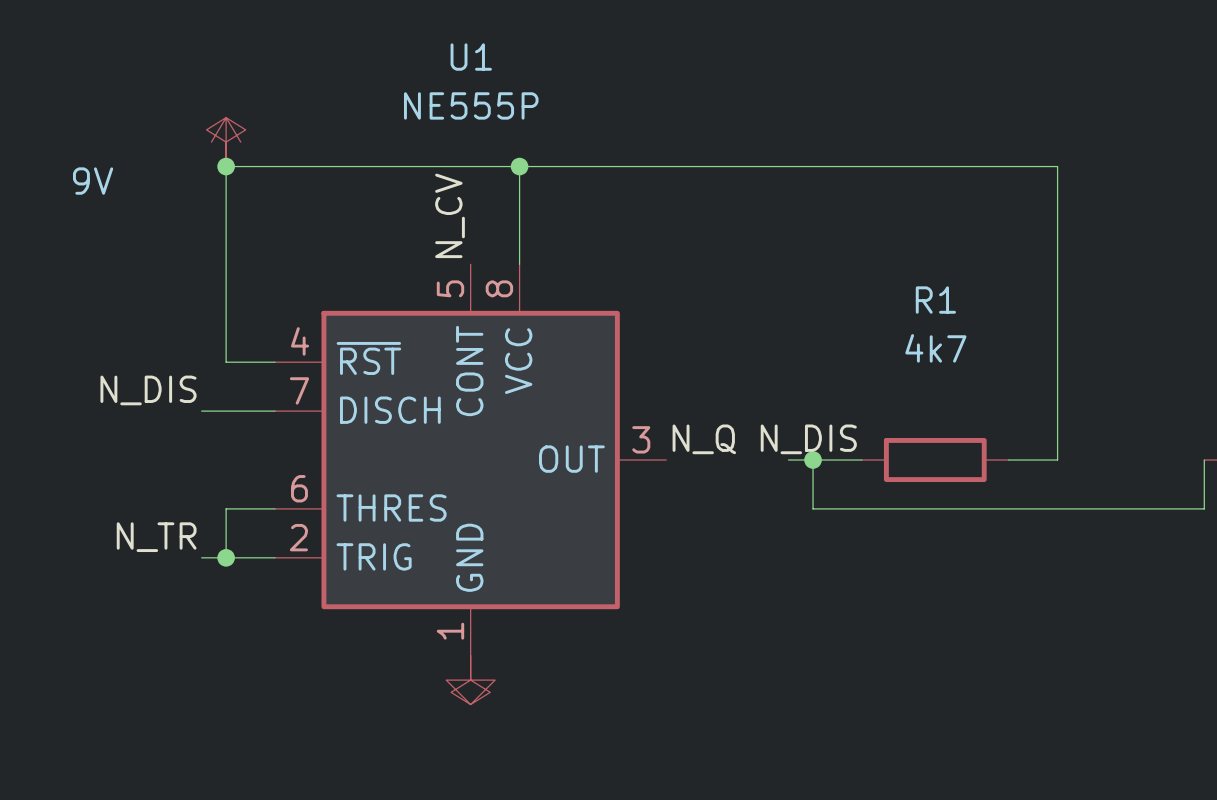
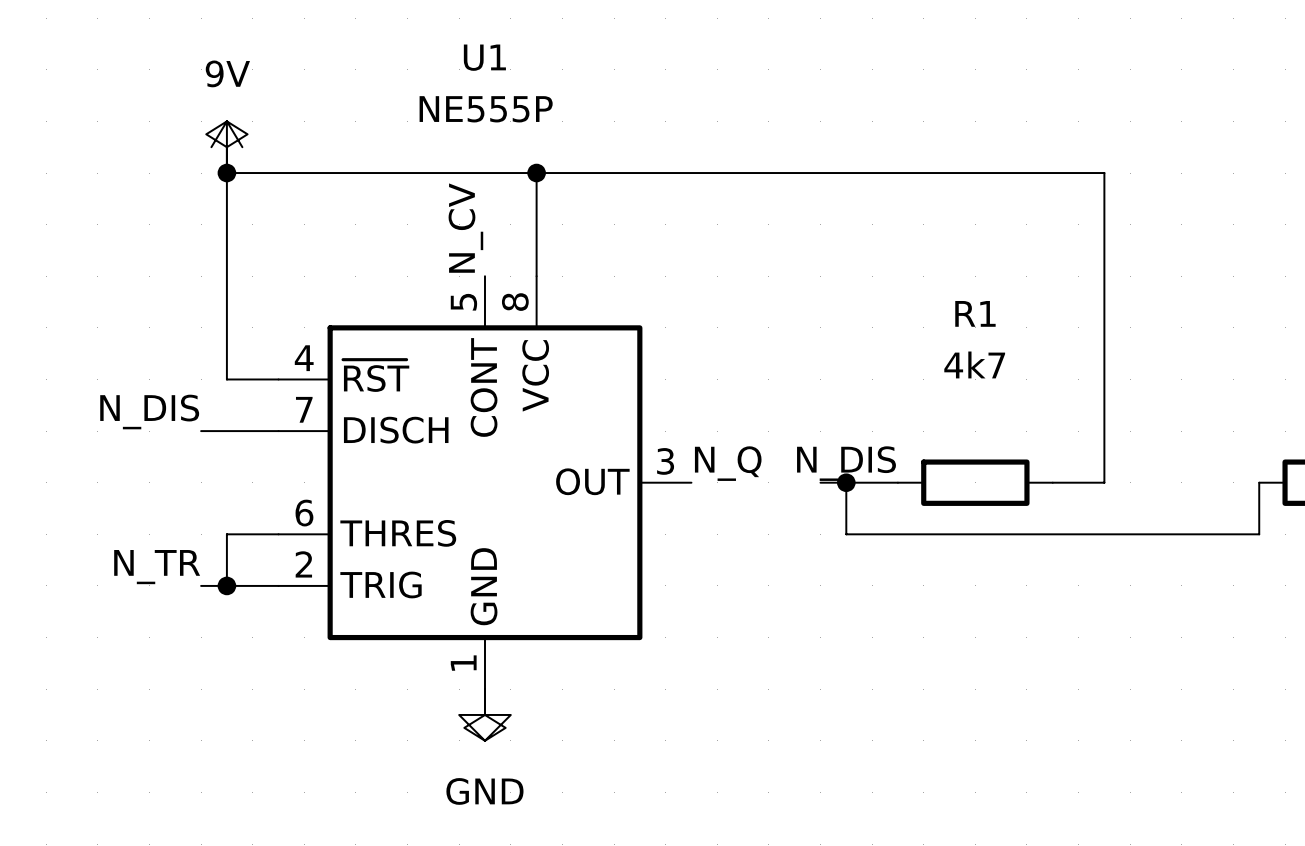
power symbol text position: 9V (93, 181) -> 9V (227, 73)
power symbol text: none -> GND (484, 791)

